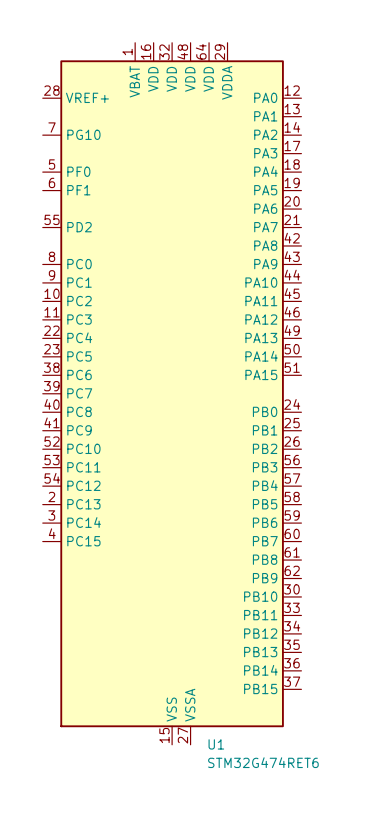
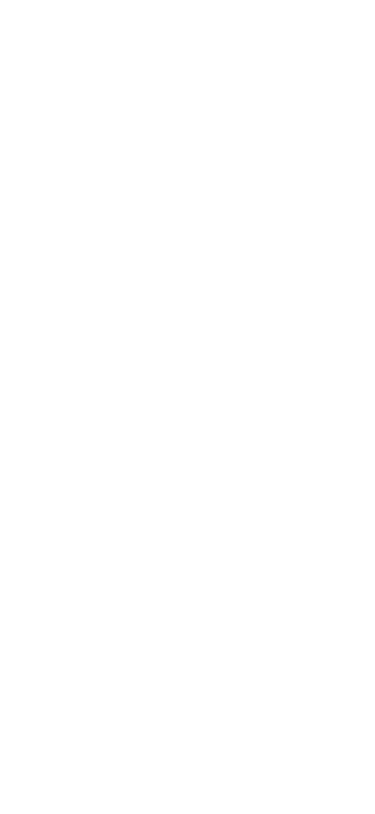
U1: STM32G474RET6 (172, 393) -> none

